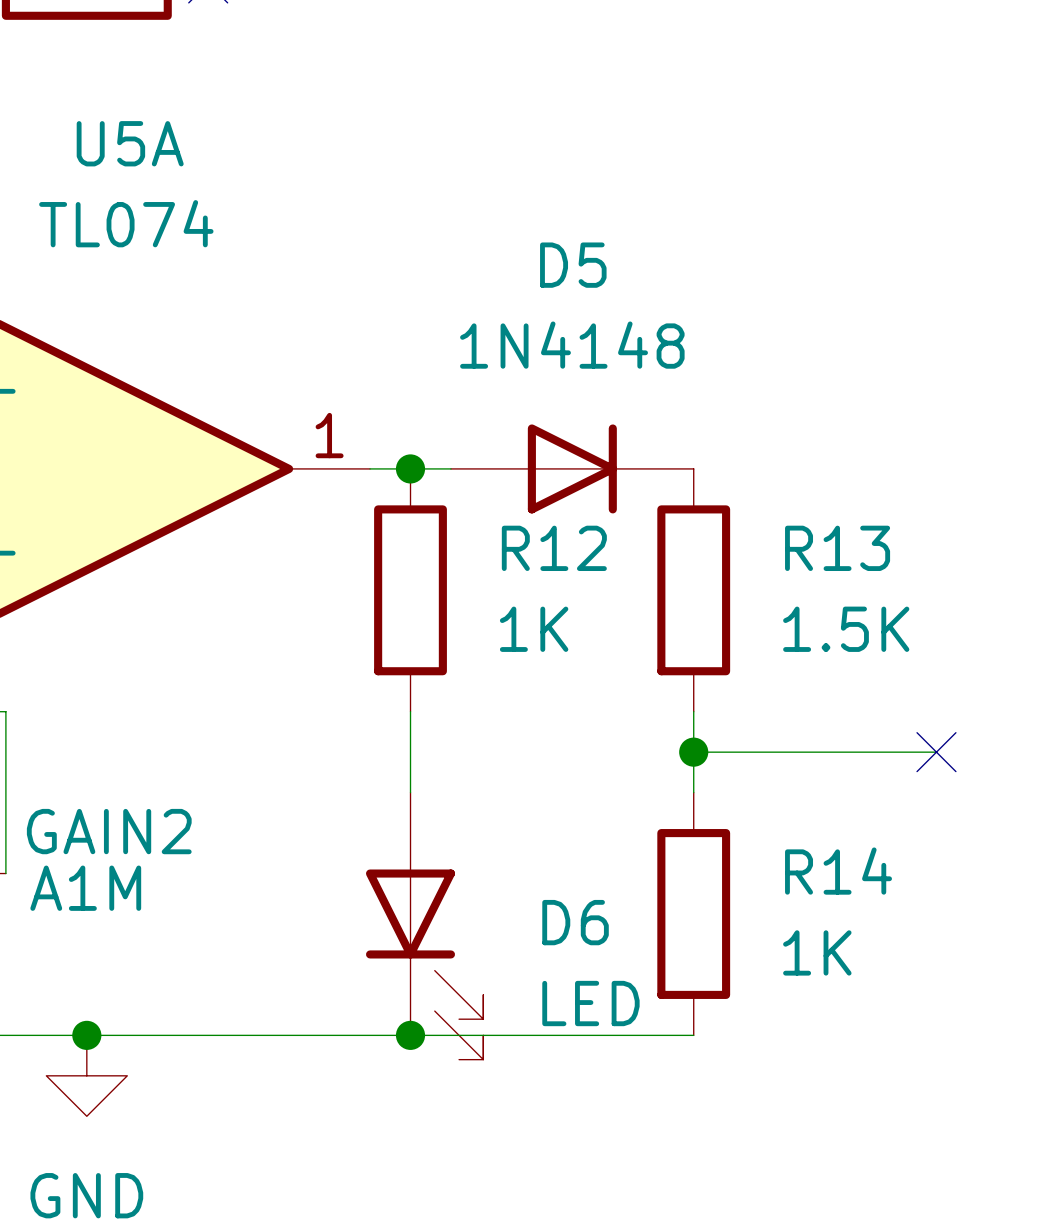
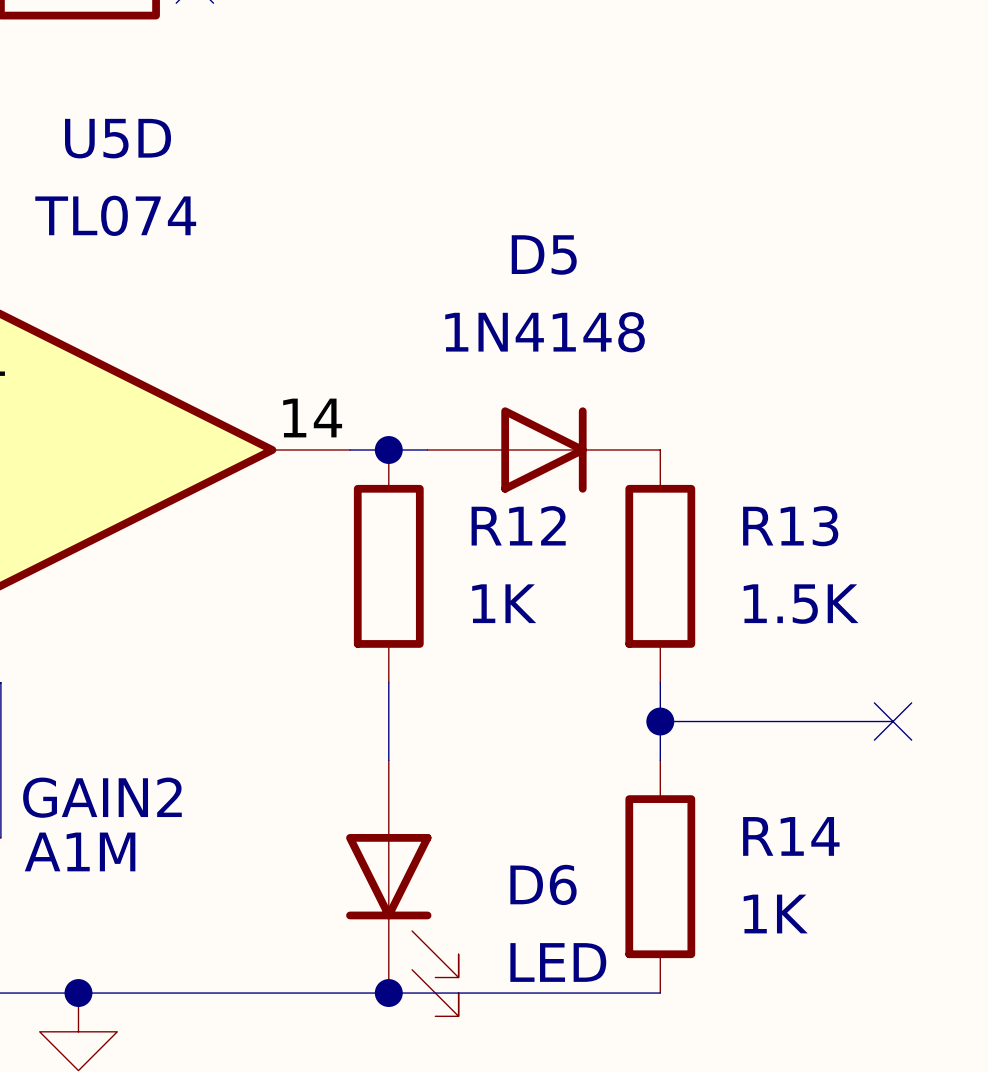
U5A name: U5A (130, 143) -> U5D (118, 138)
U5A pin number: 1 (329, 435) -> 14 (312, 418)

